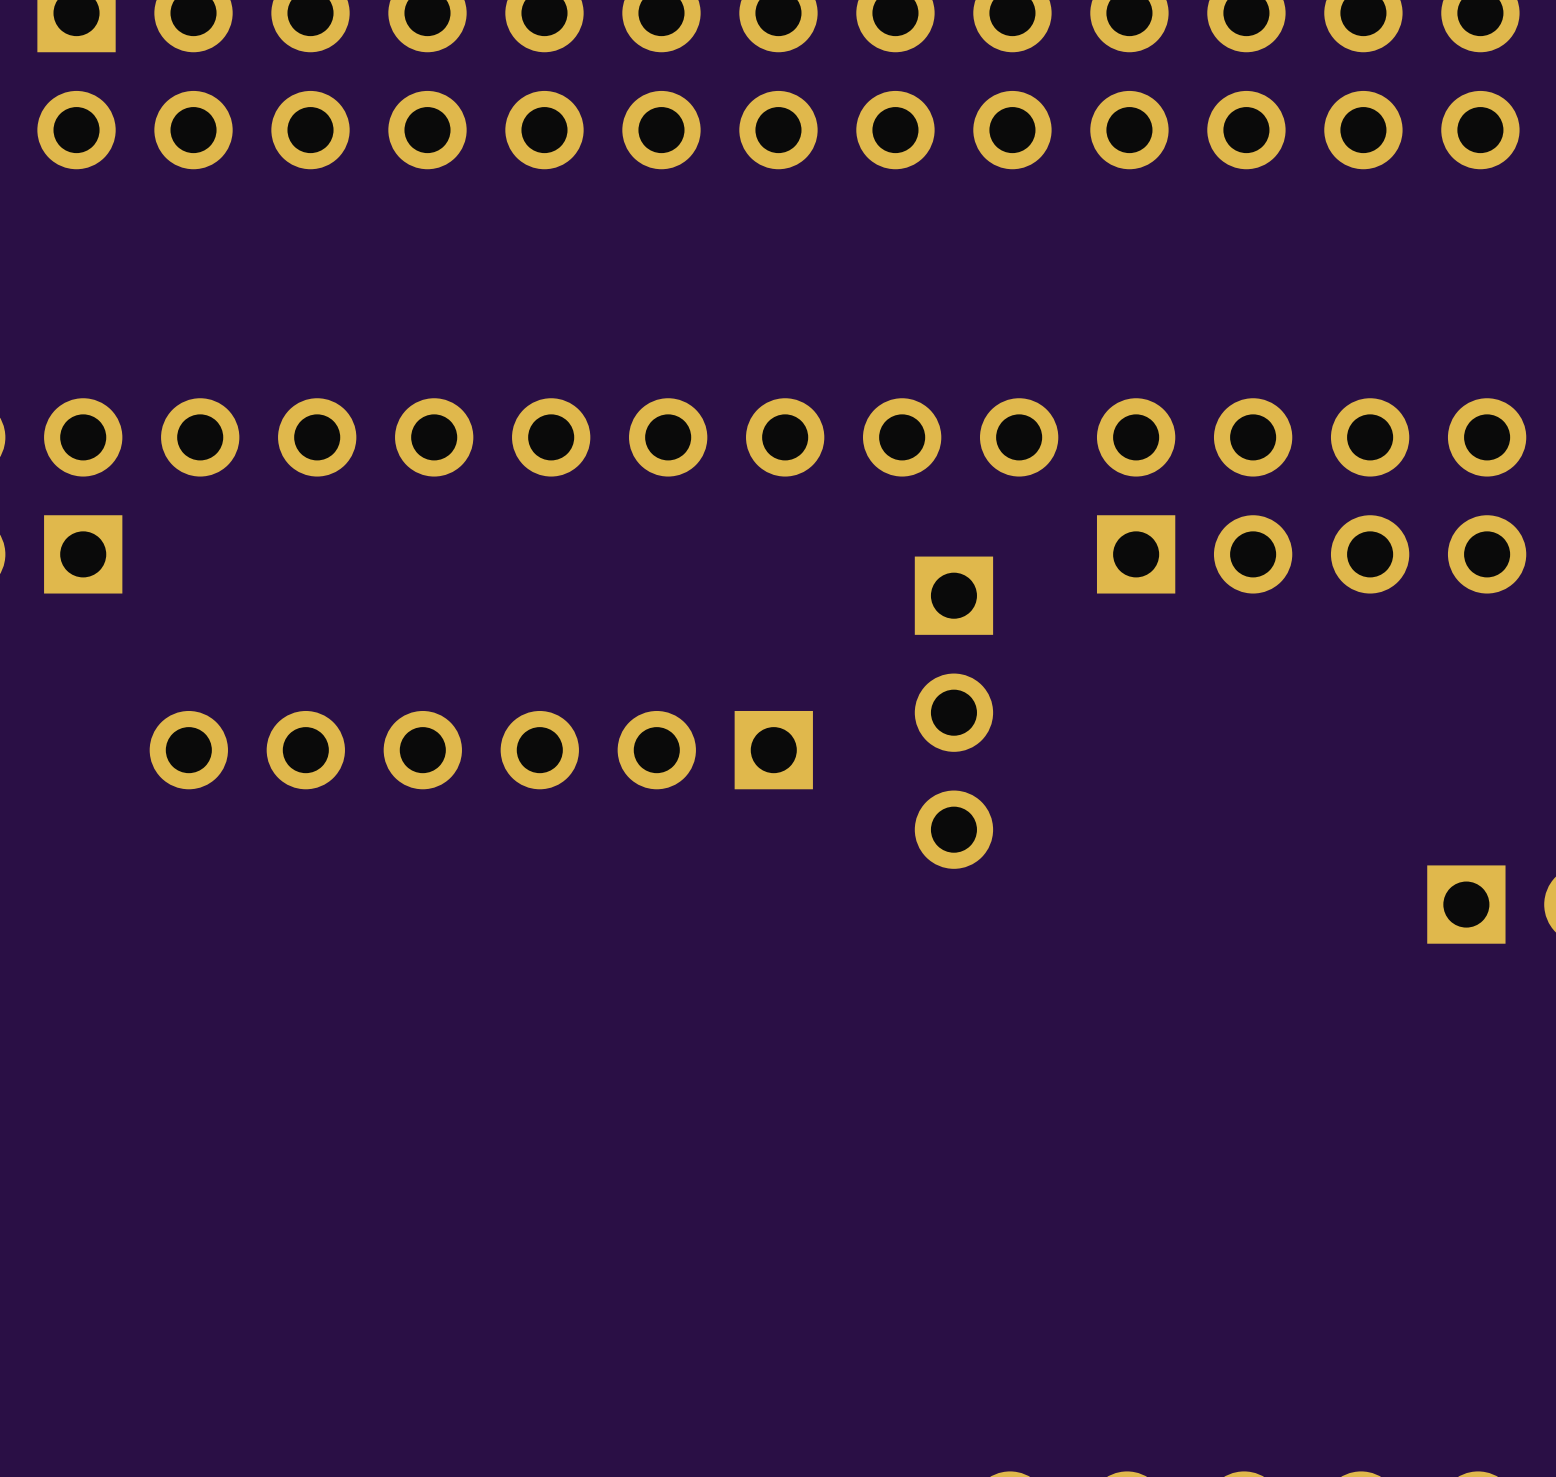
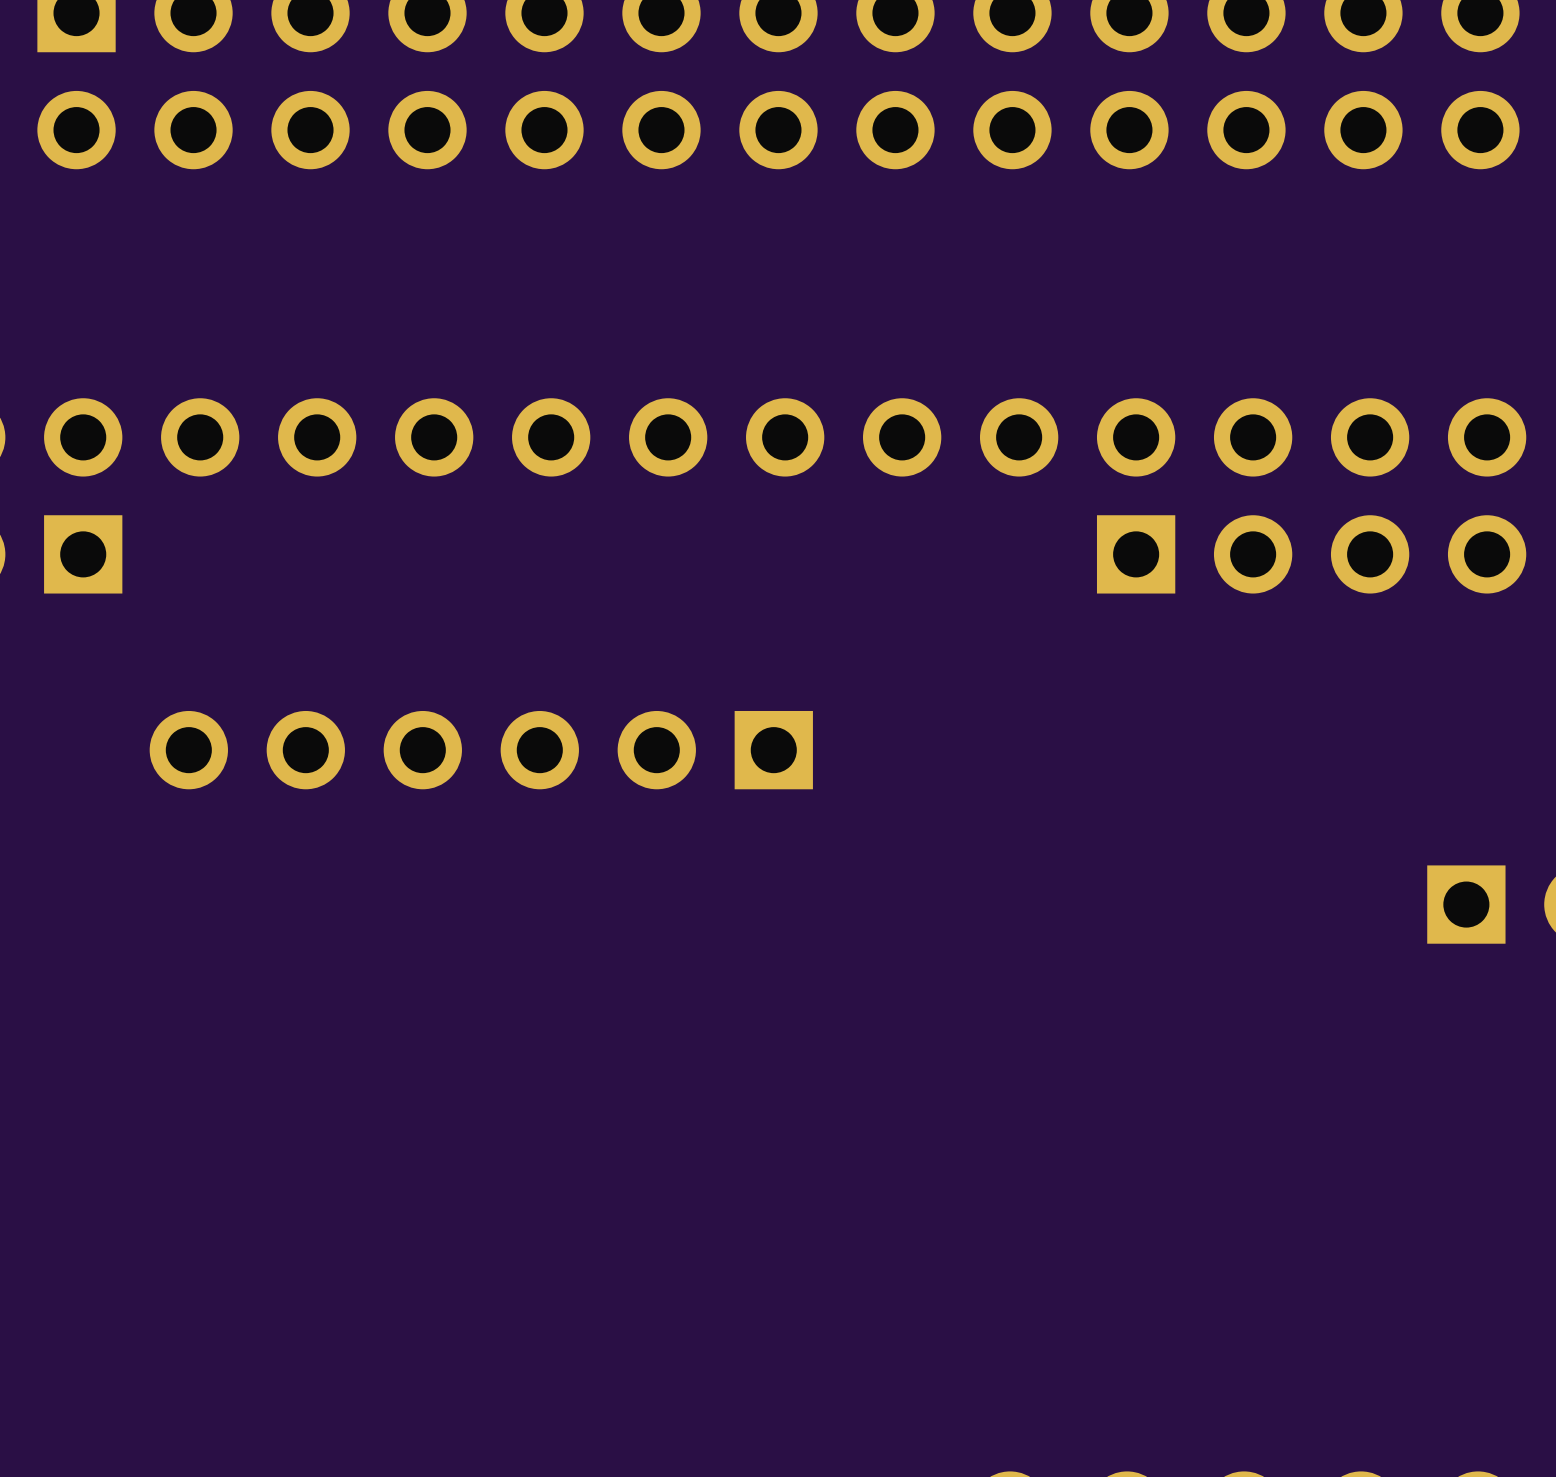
part: (953, 712) -> none

